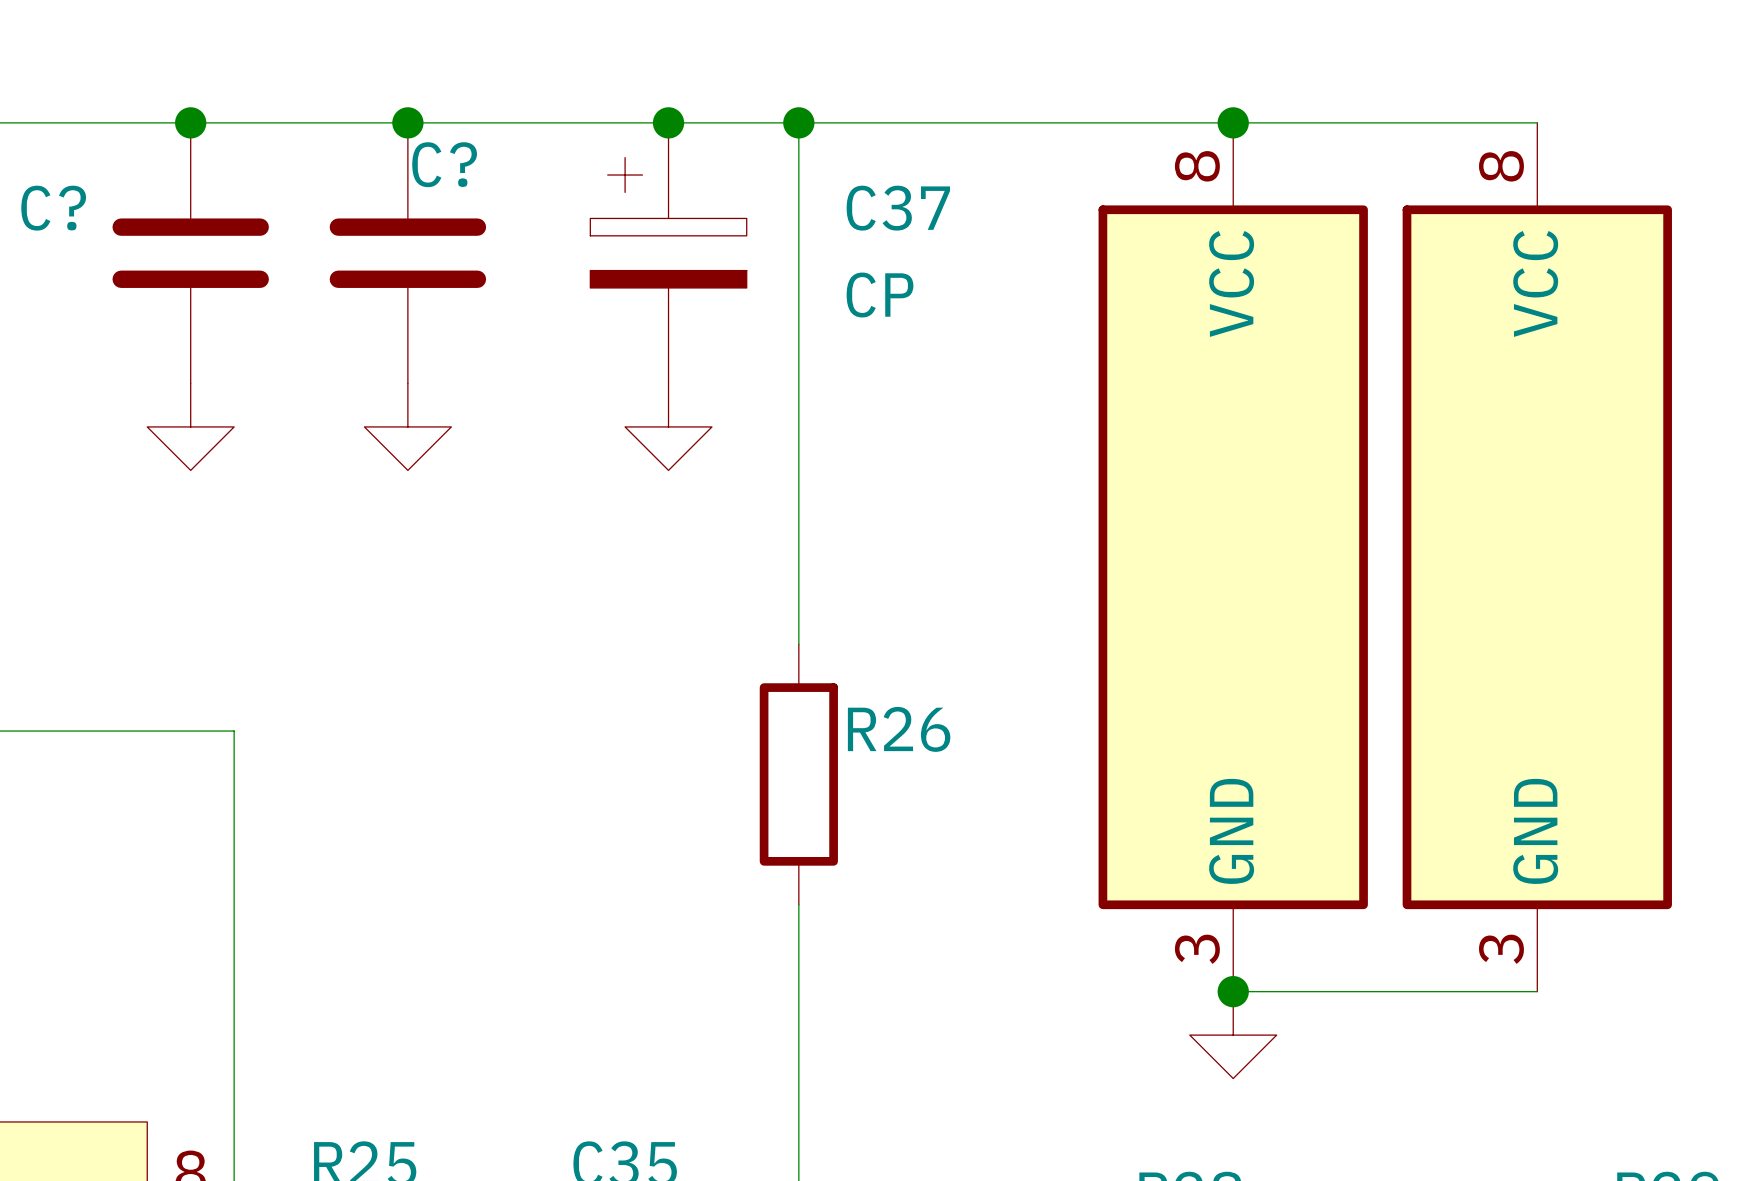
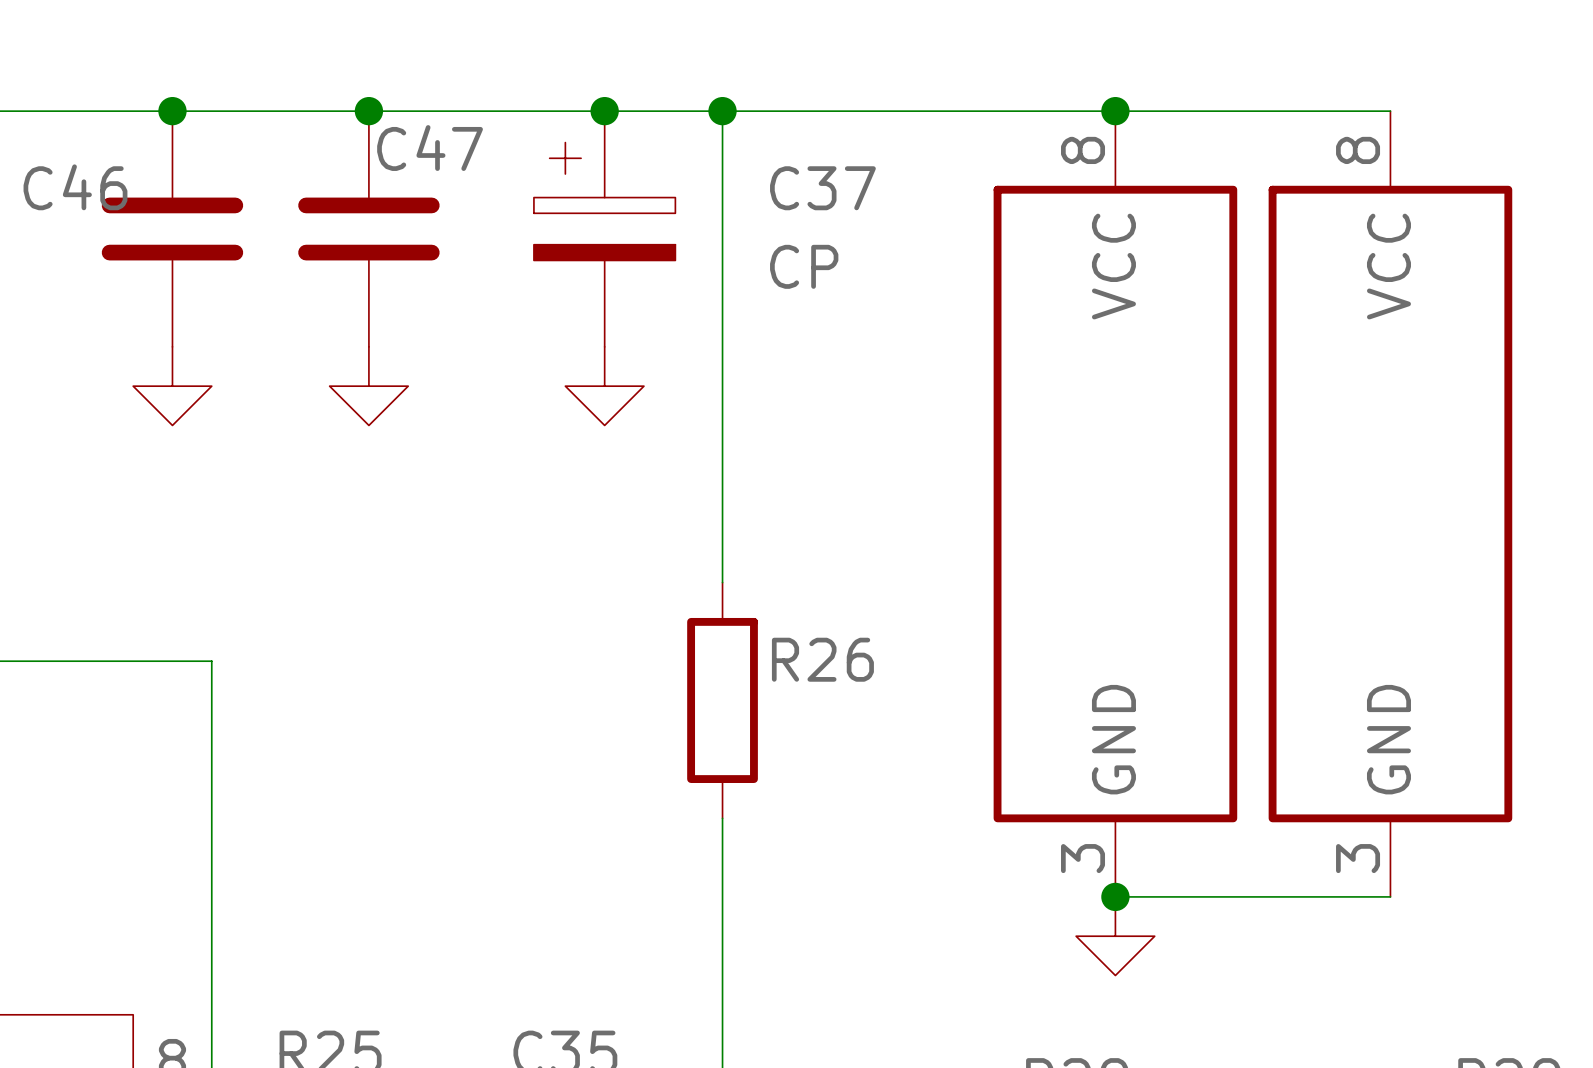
C? name: C? (444, 164) -> C47 (430, 148)
C? name: C? (53, 208) -> C46 (75, 187)

